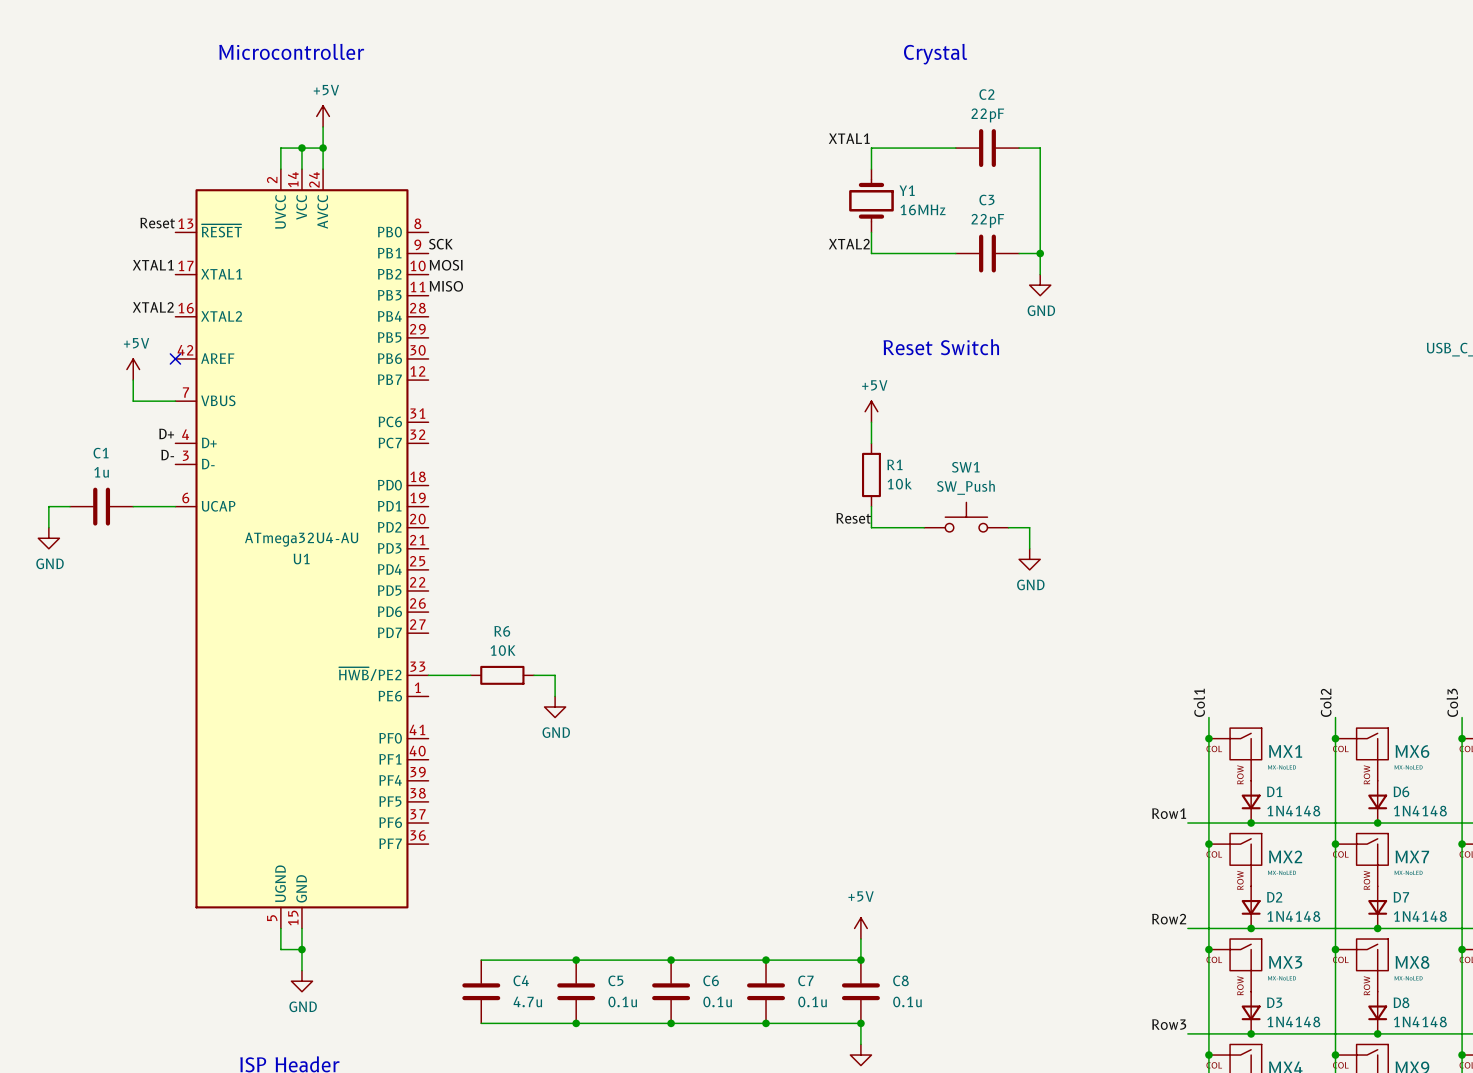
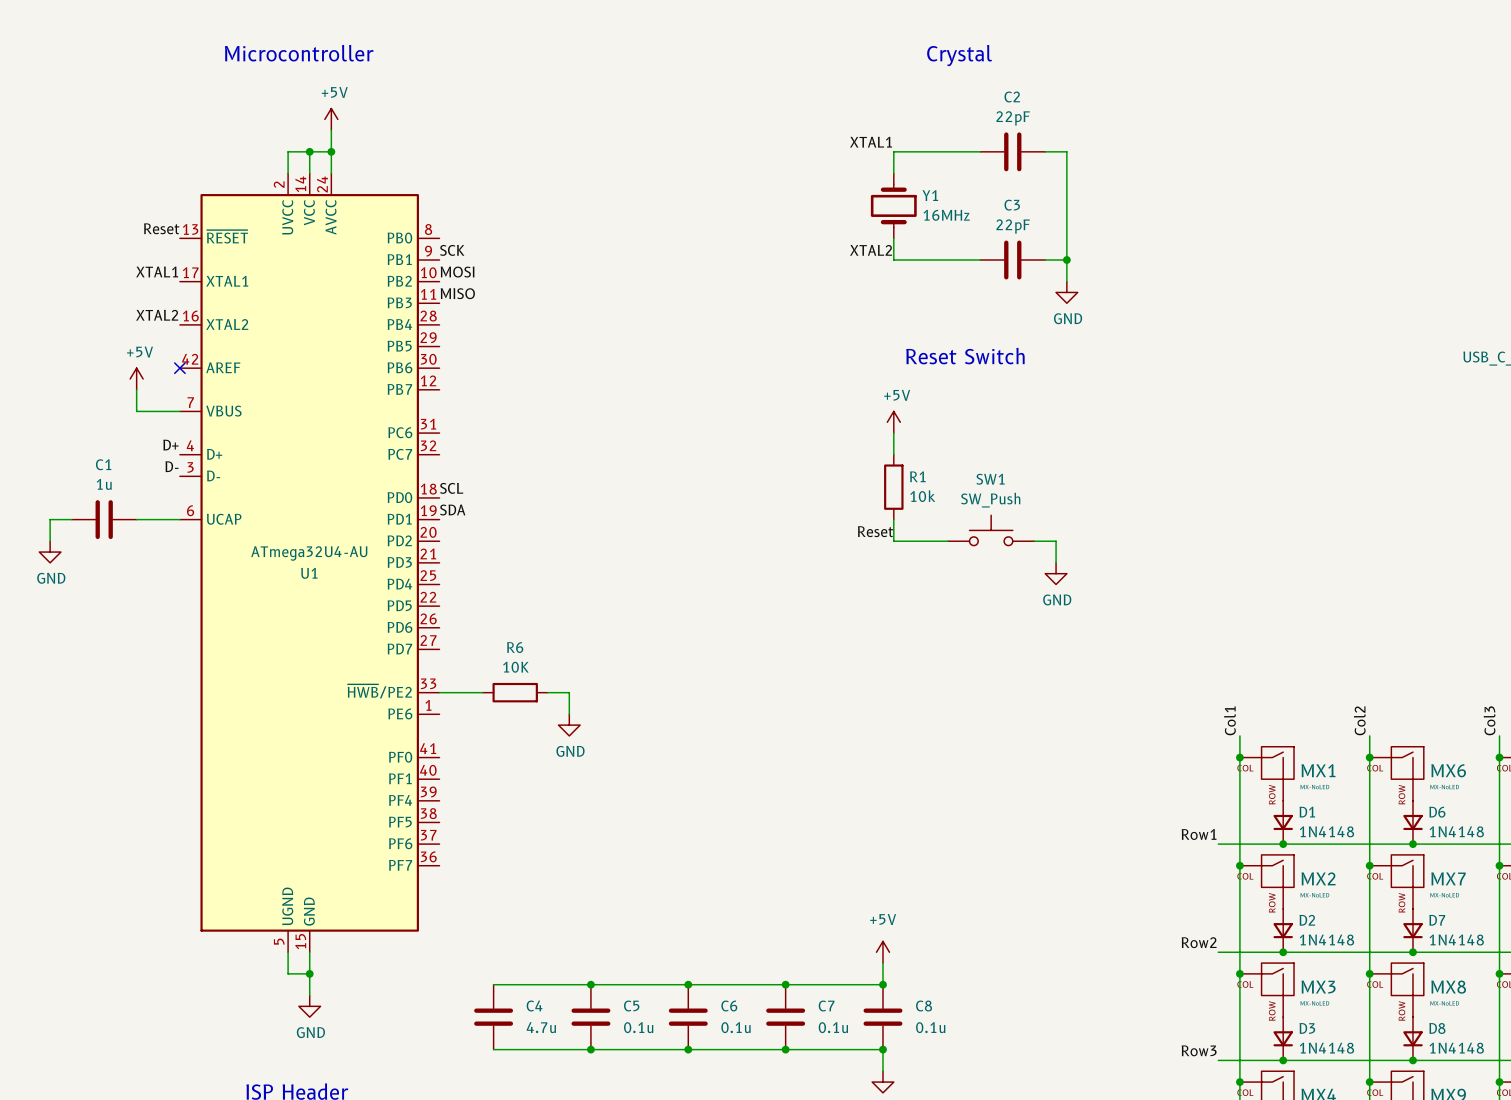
label: none -> SCL (451, 488)
label: none -> SDA (452, 510)

